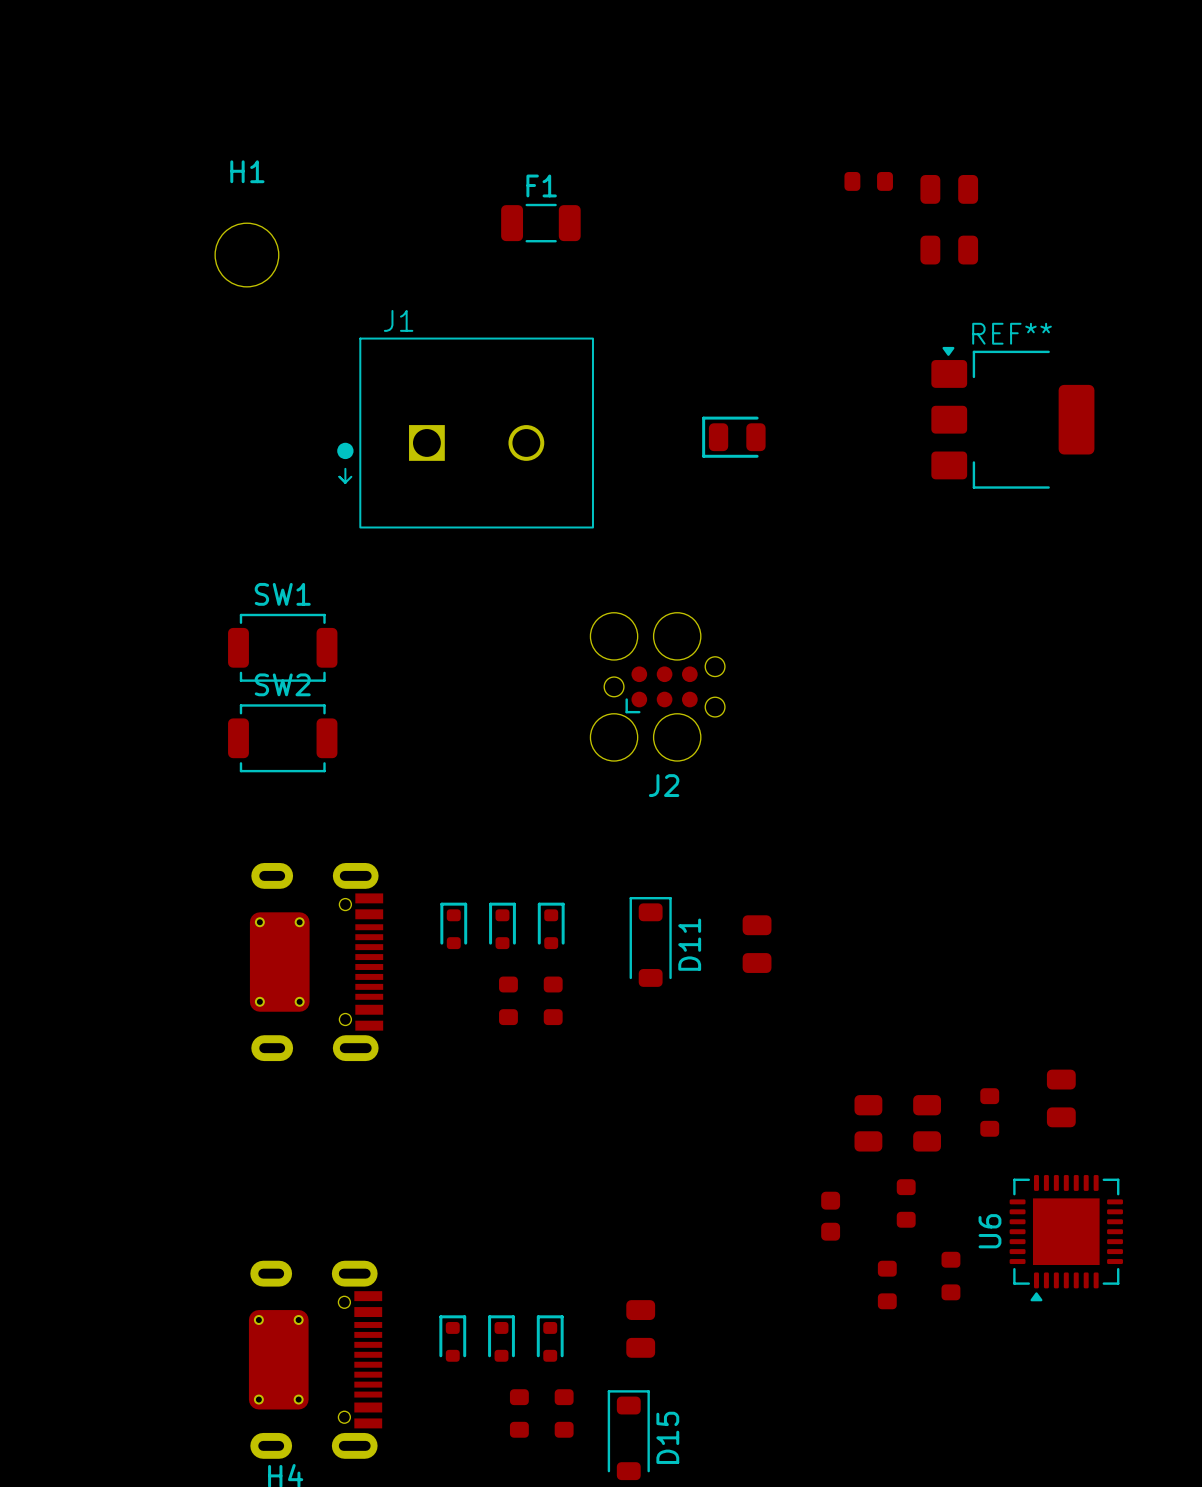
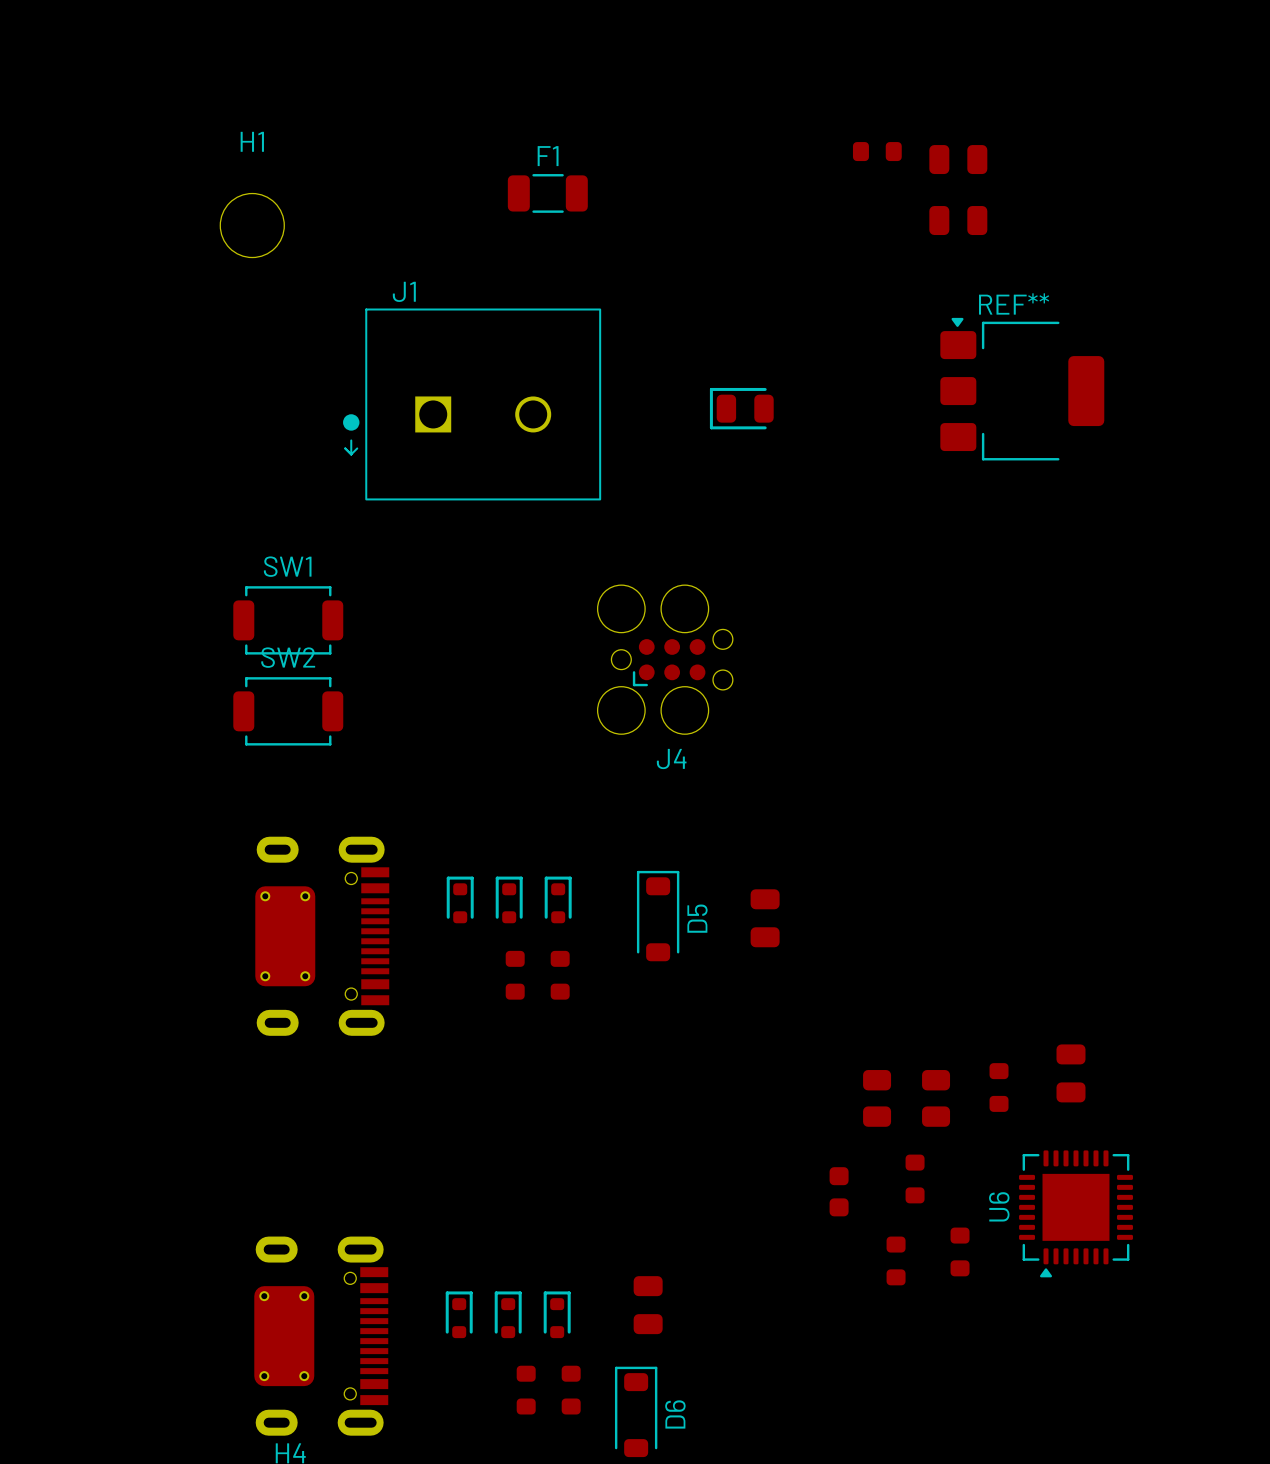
J2 name: J2 (664, 785) -> J4 (671, 758)
D11 name: D11 (689, 944) -> D5 (697, 918)
D15 name: D15 (667, 1437) -> D6 (675, 1414)

